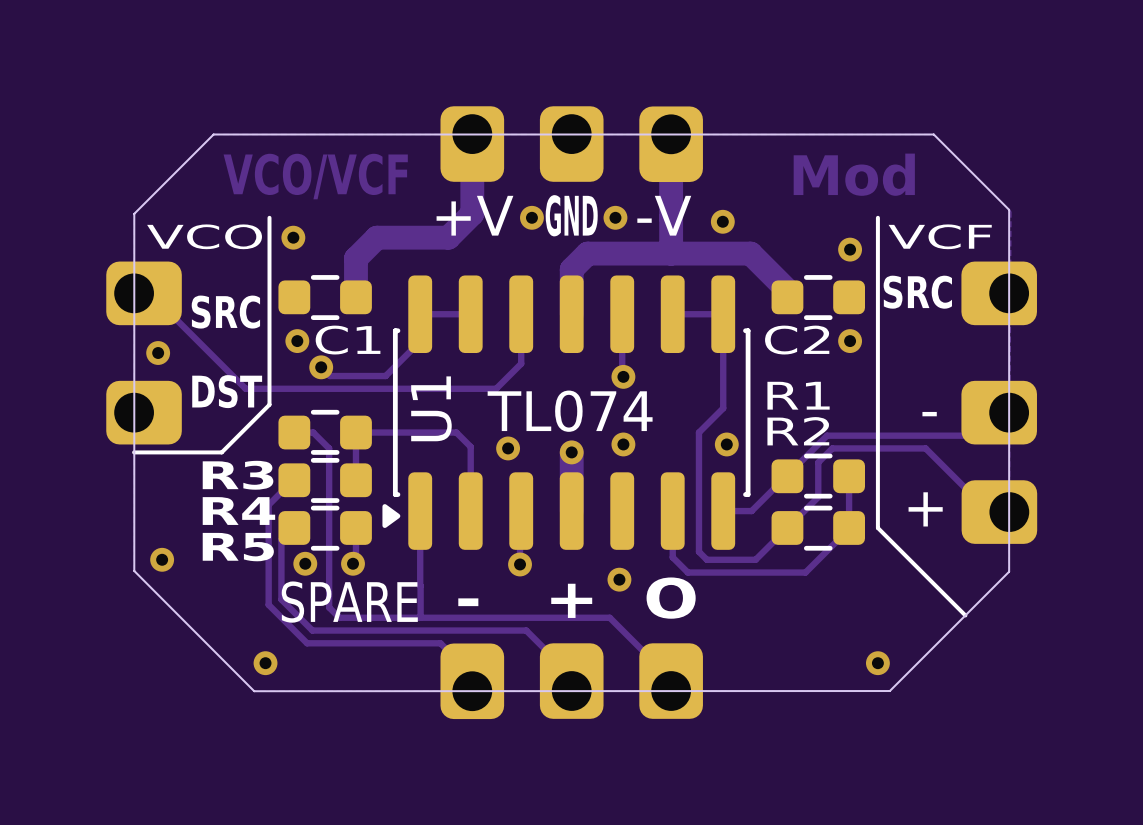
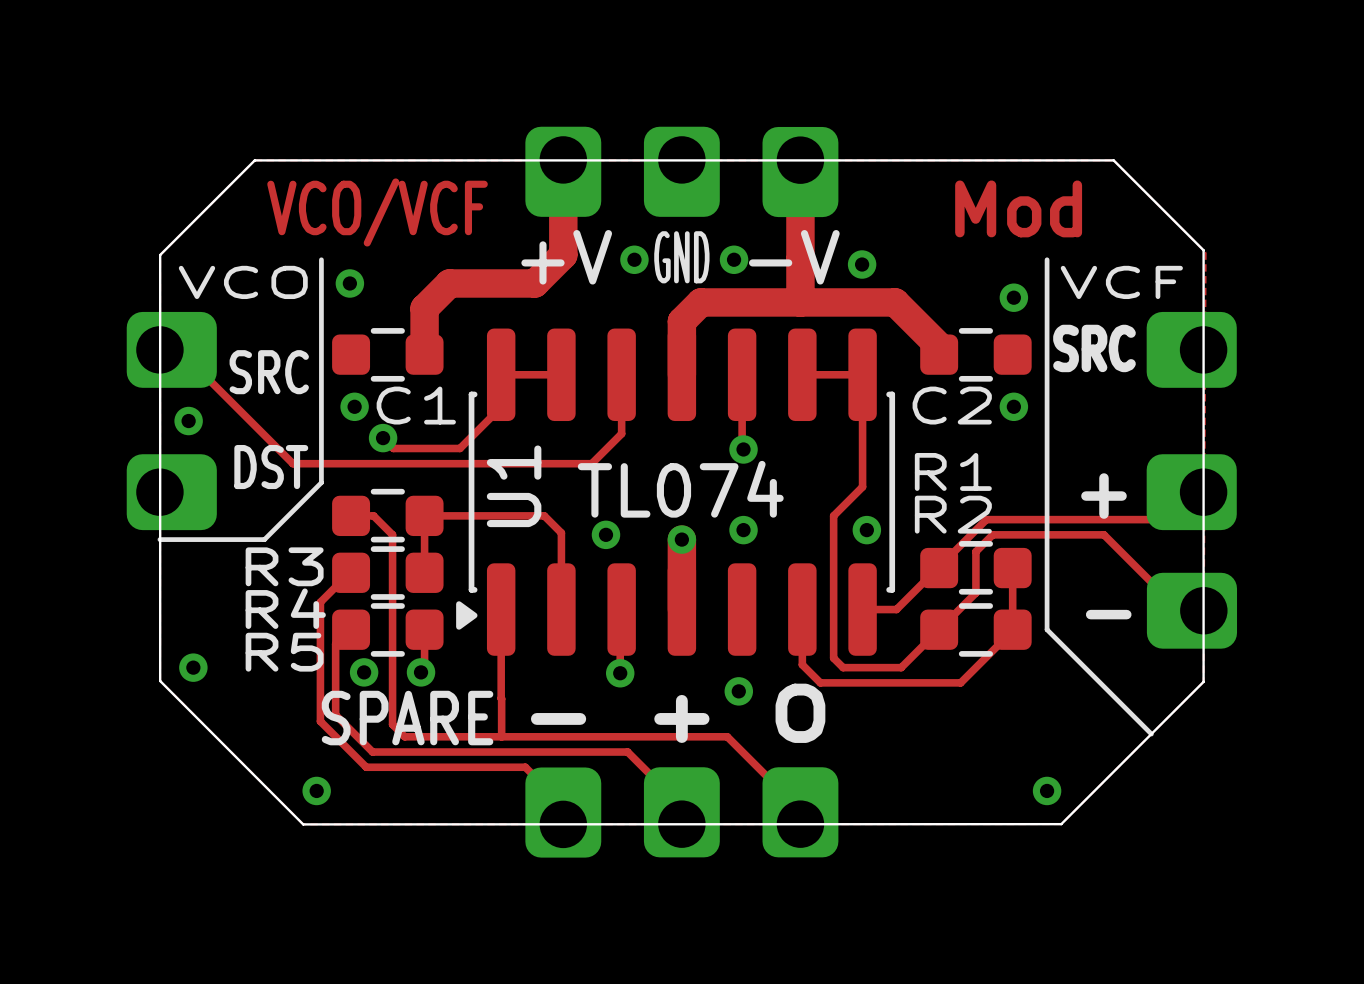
text position: - (929, 414) -> - (1108, 614)
text position: + (925, 509) -> + (1103, 496)

